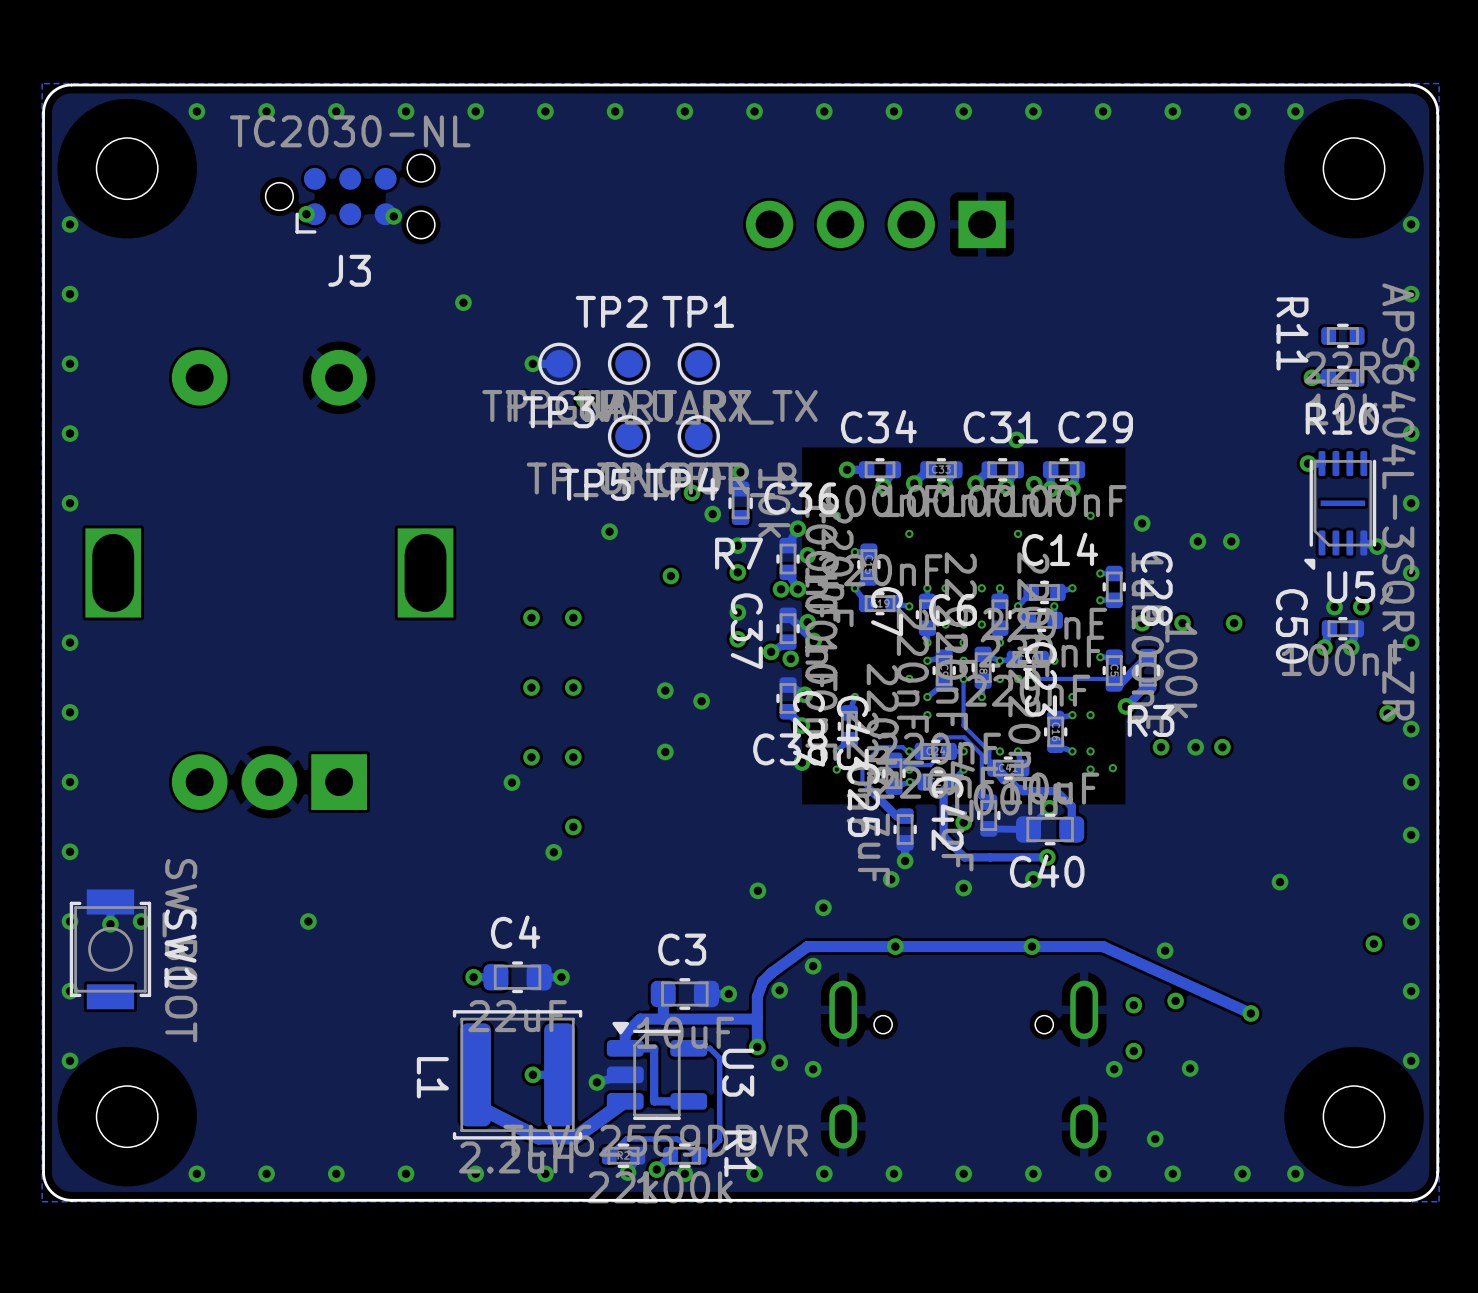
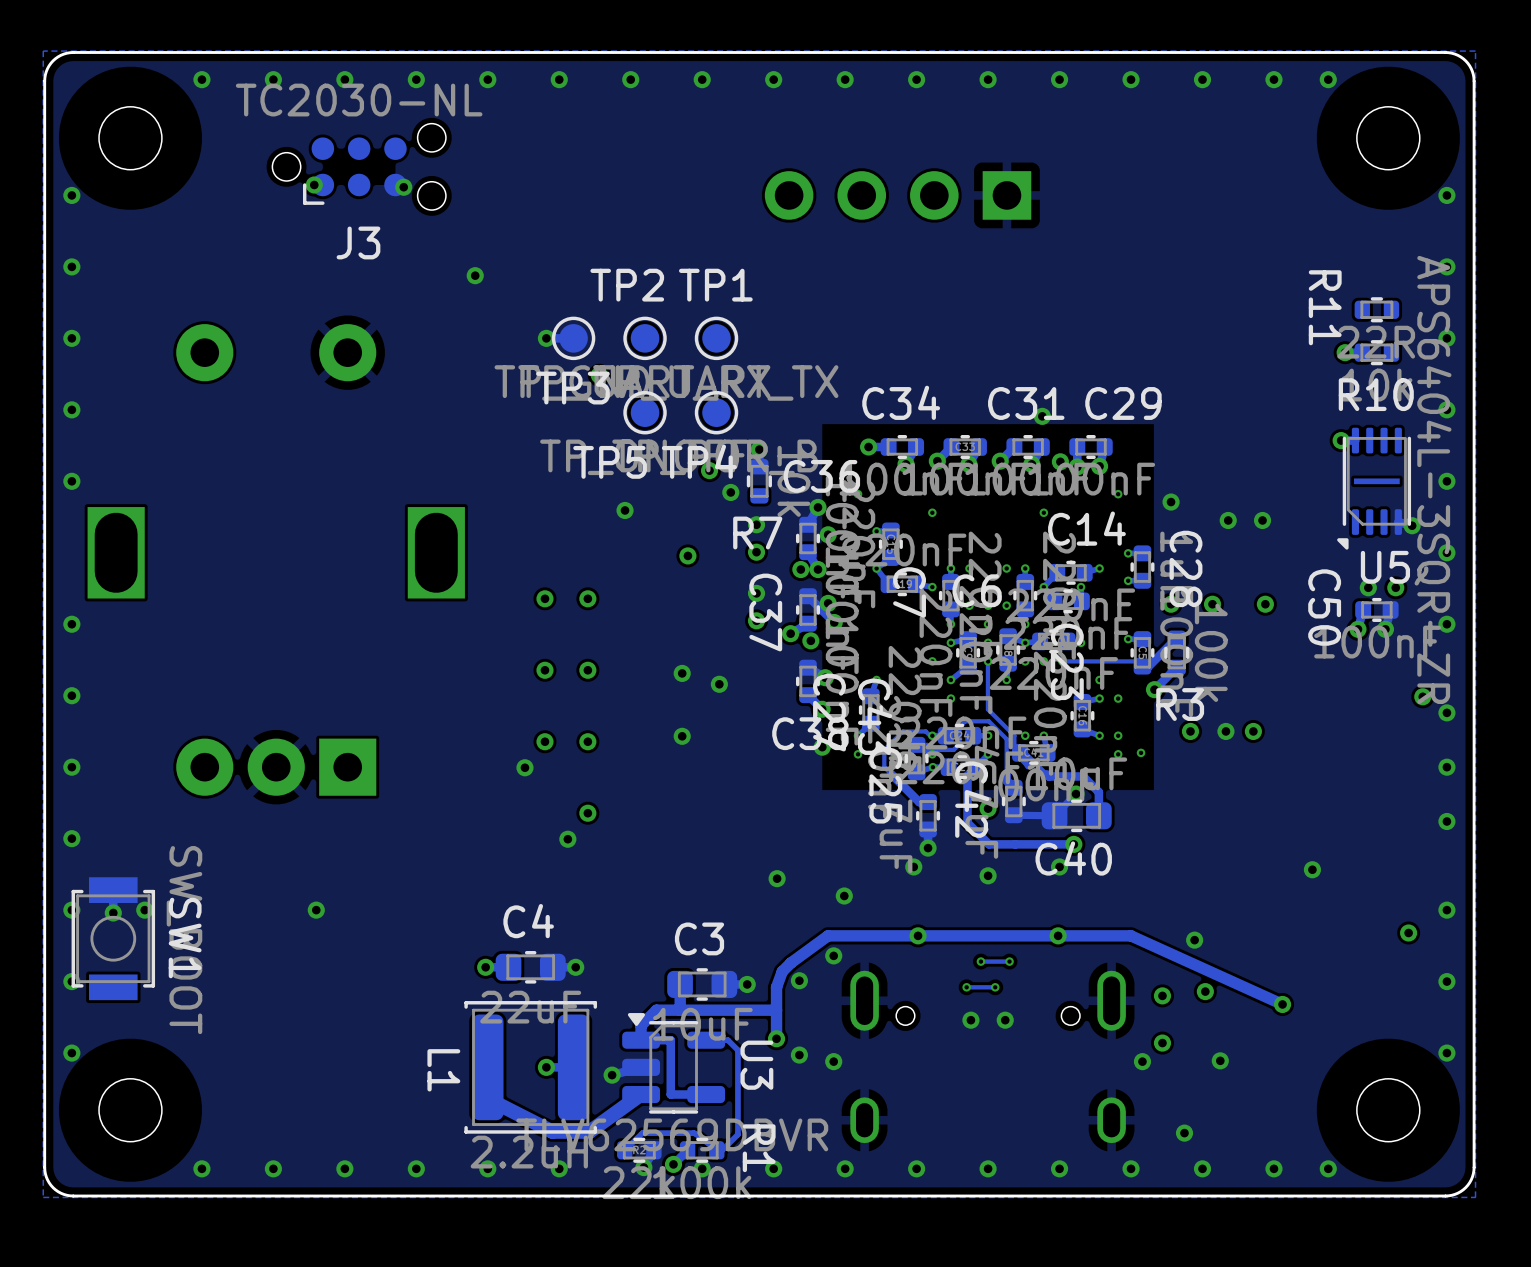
via: none -> (980, 961)
track: none -> (1009, 961) (980, 961)
via: none -> (1009, 961)
via: none -> (966, 987)
track: none -> (995, 987) (966, 987)
via: none -> (995, 987)
via: none -> (970, 1020)
via: none -> (1005, 1020)

